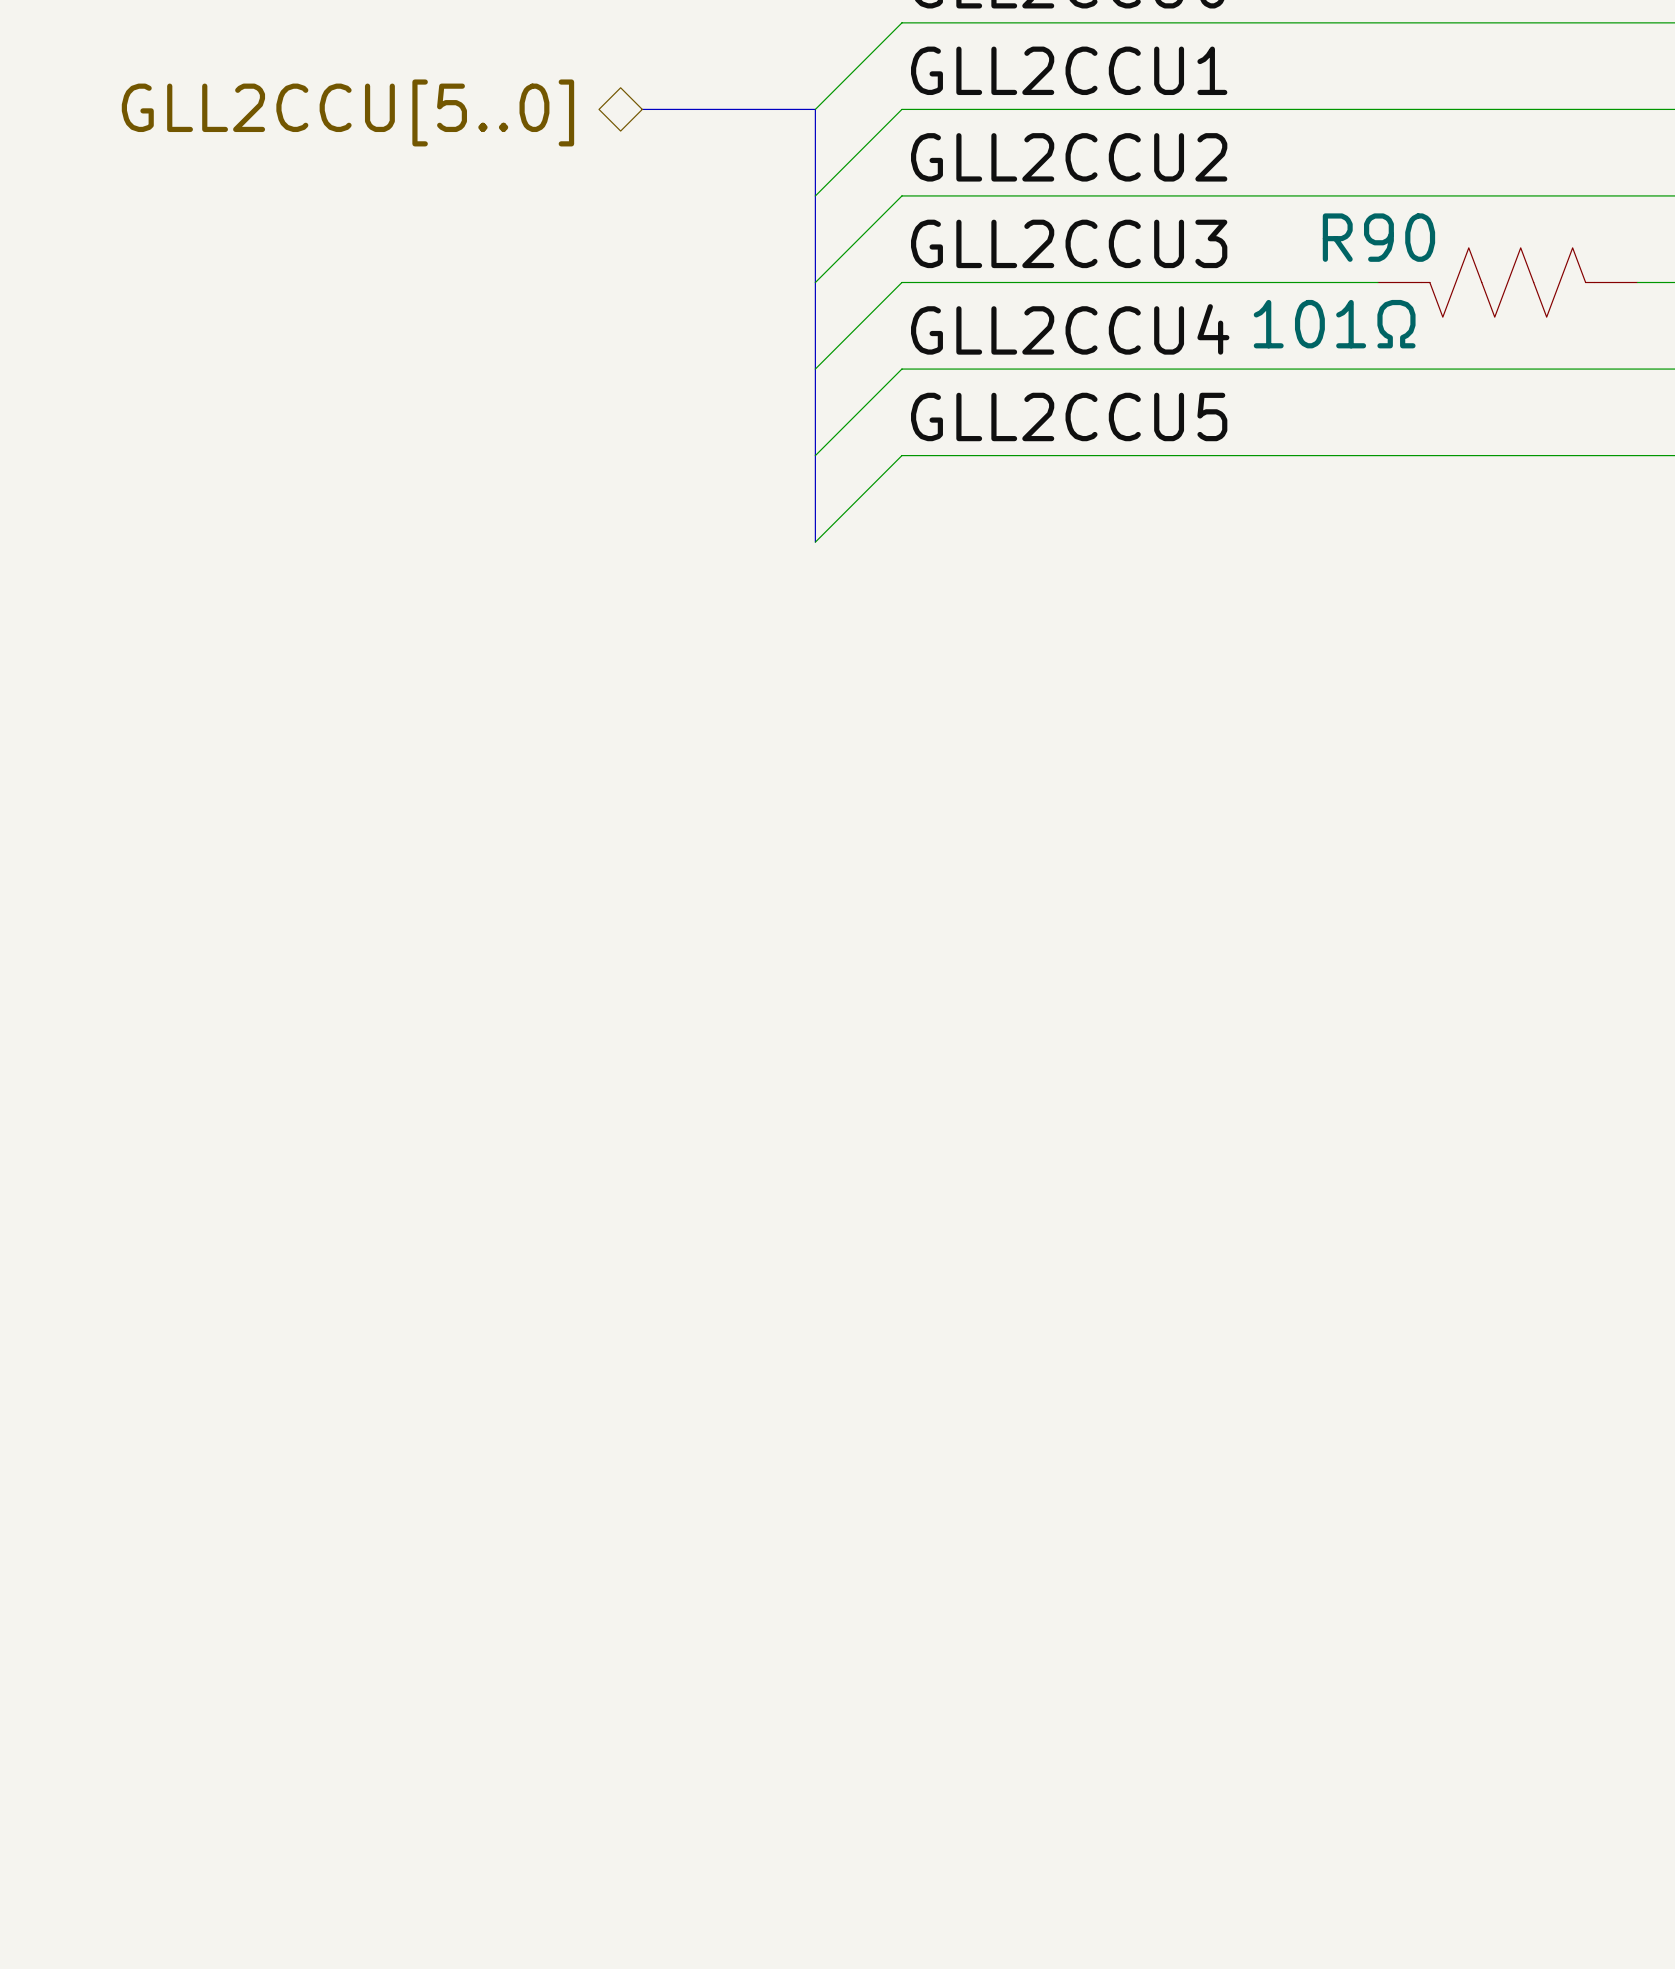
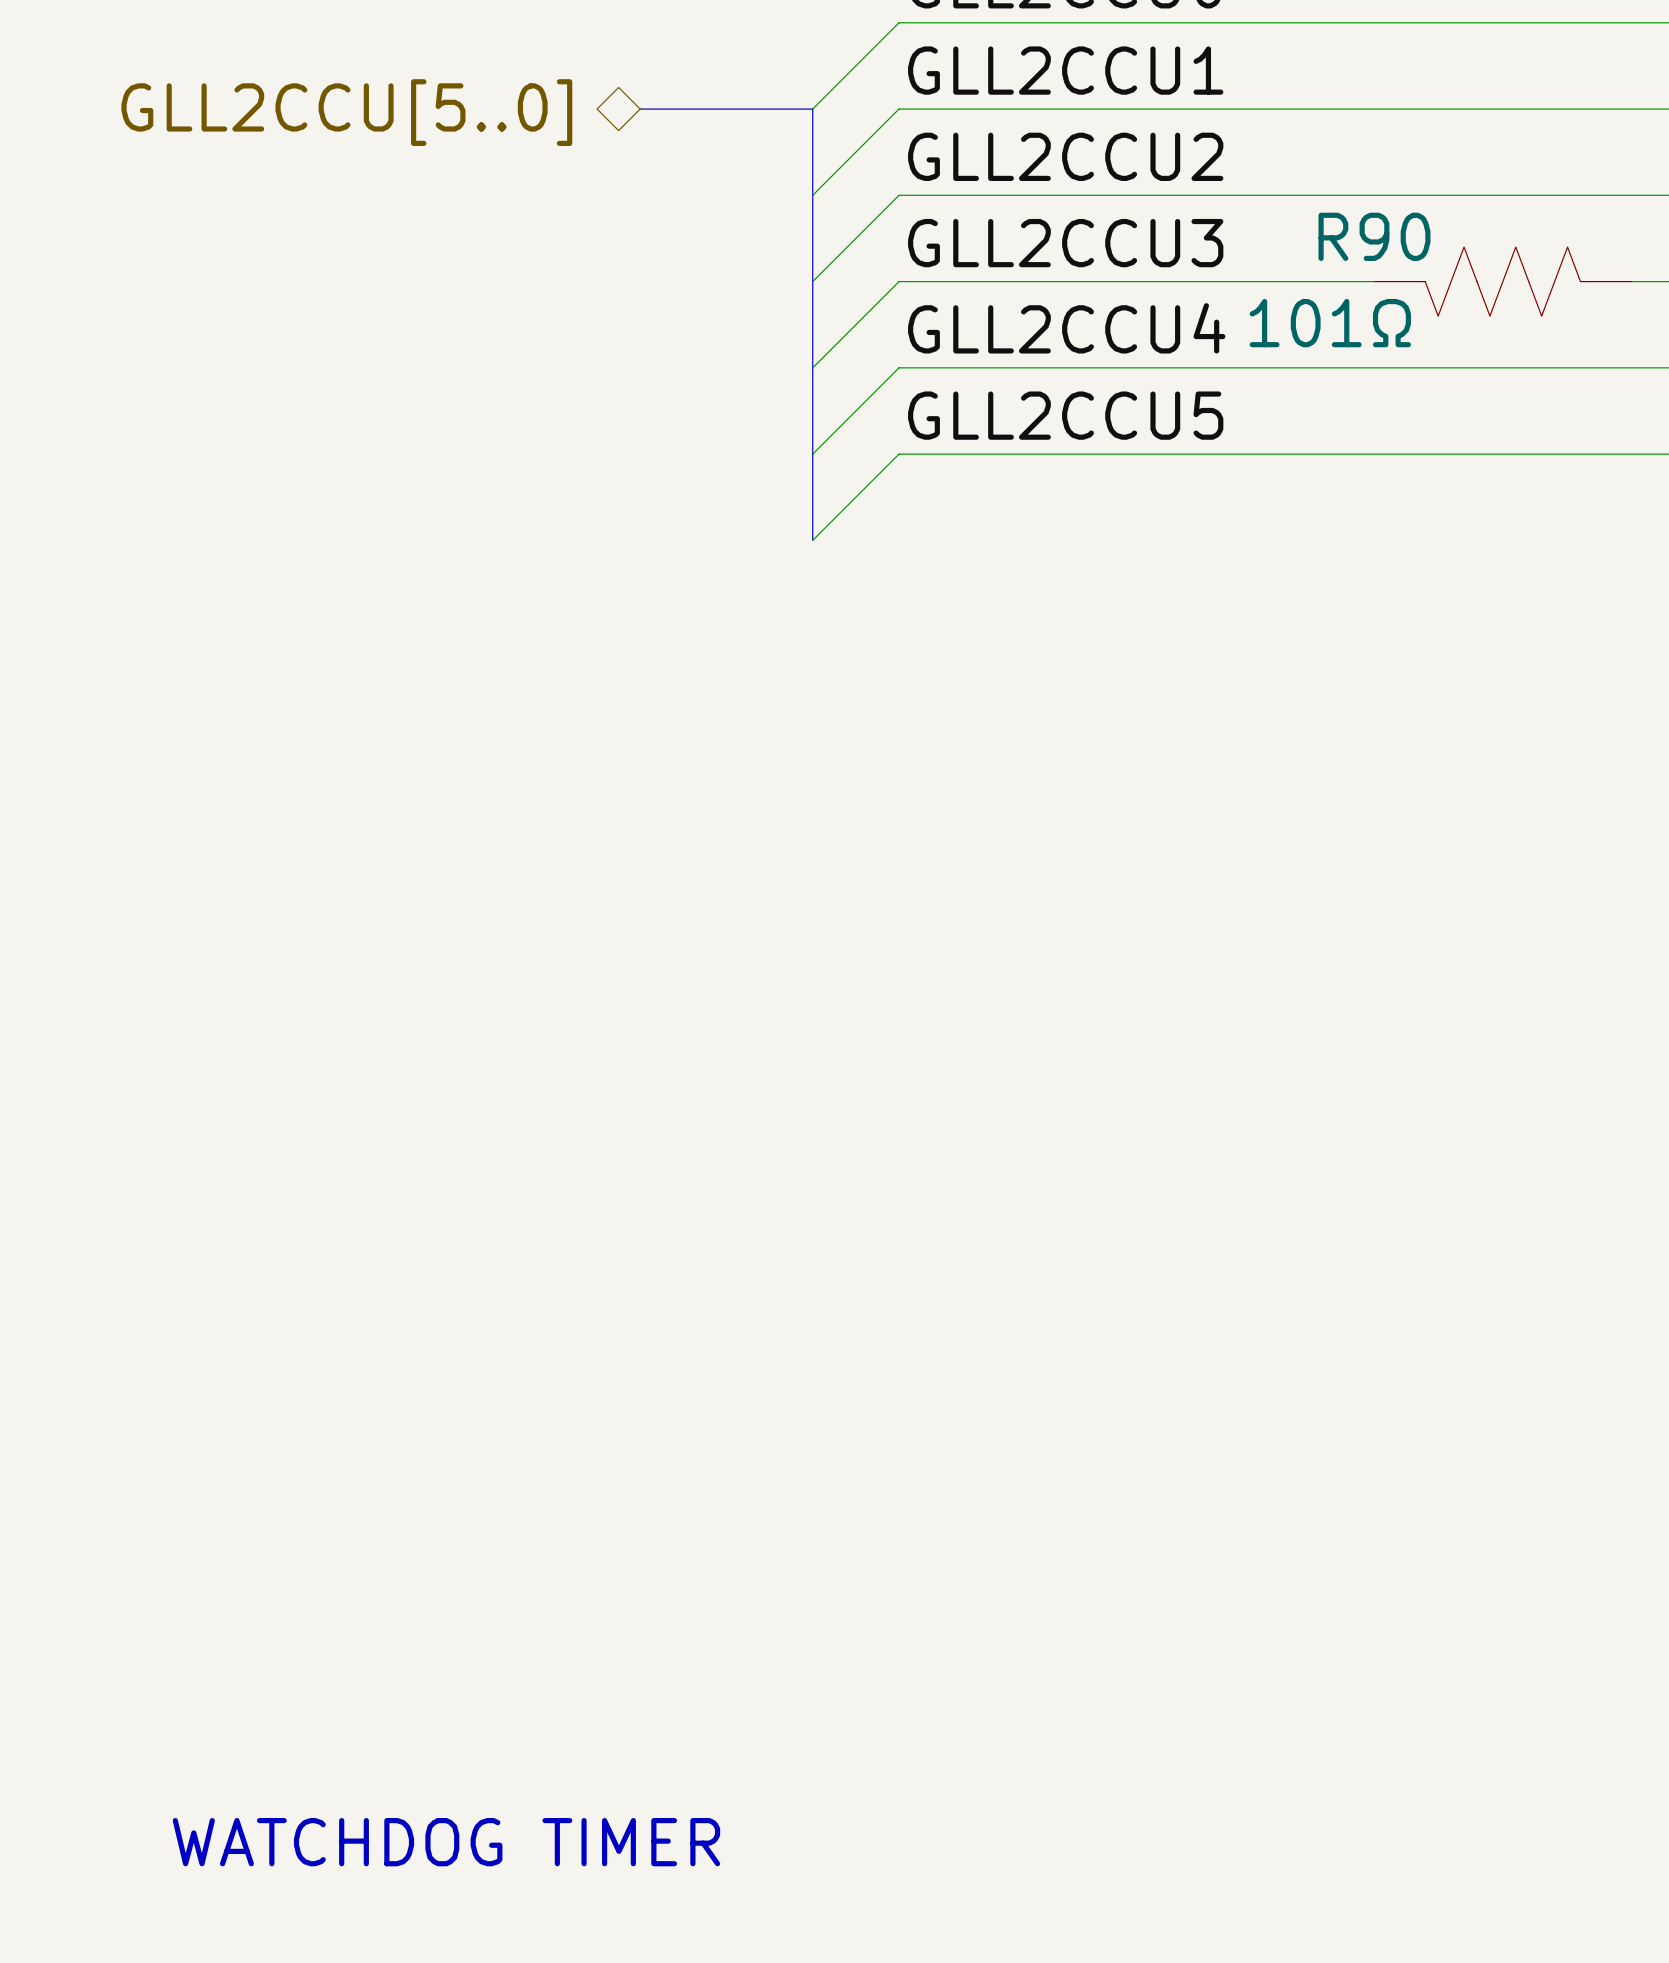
text: none -> WATCHDOG TIMER (446, 1842)

